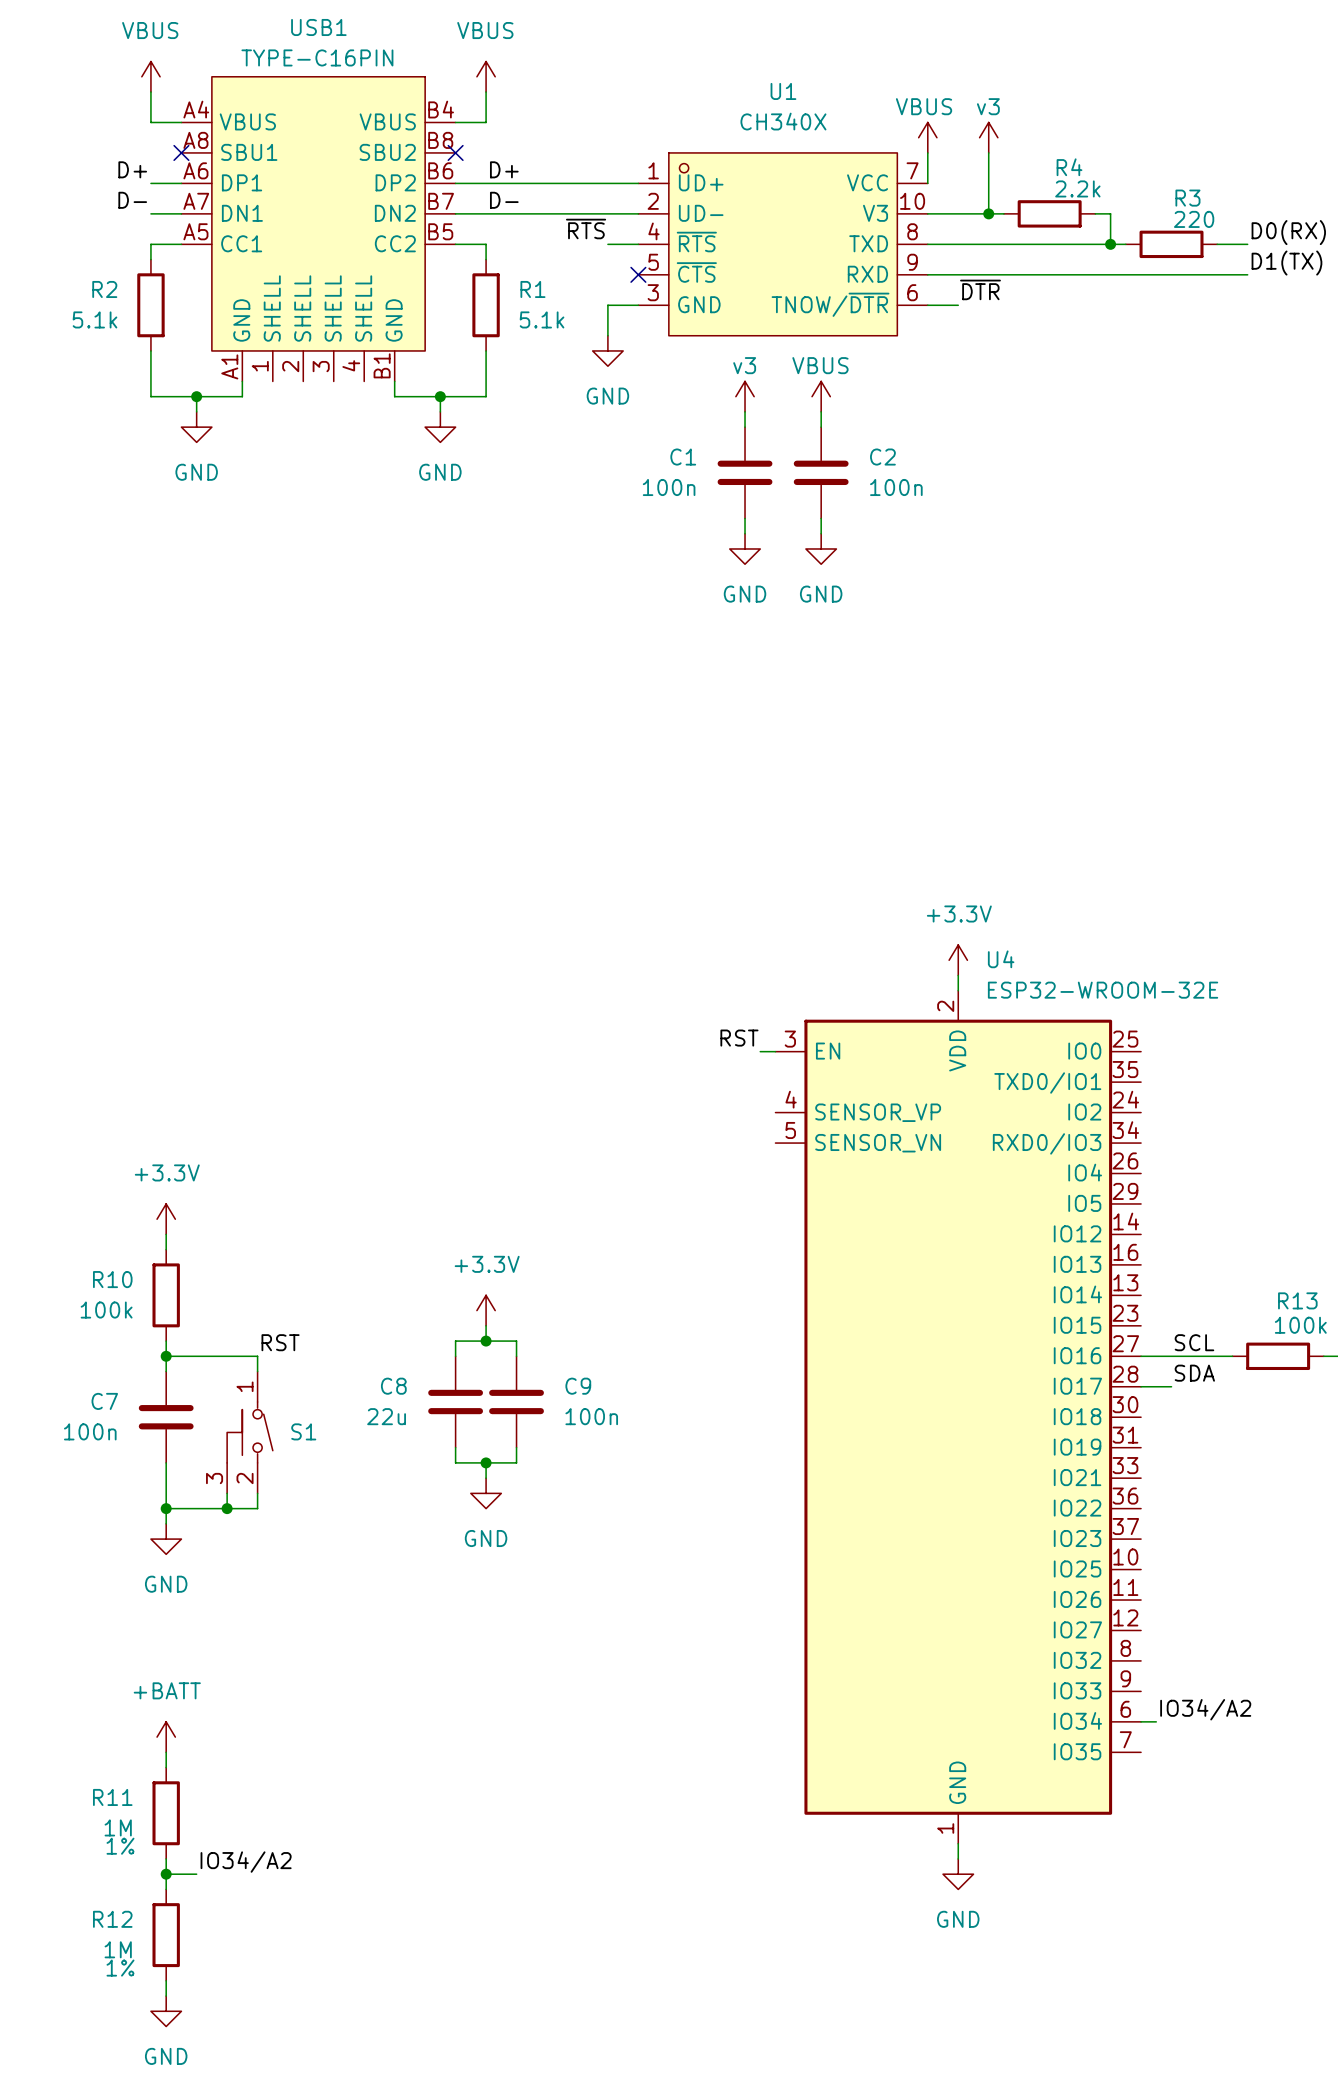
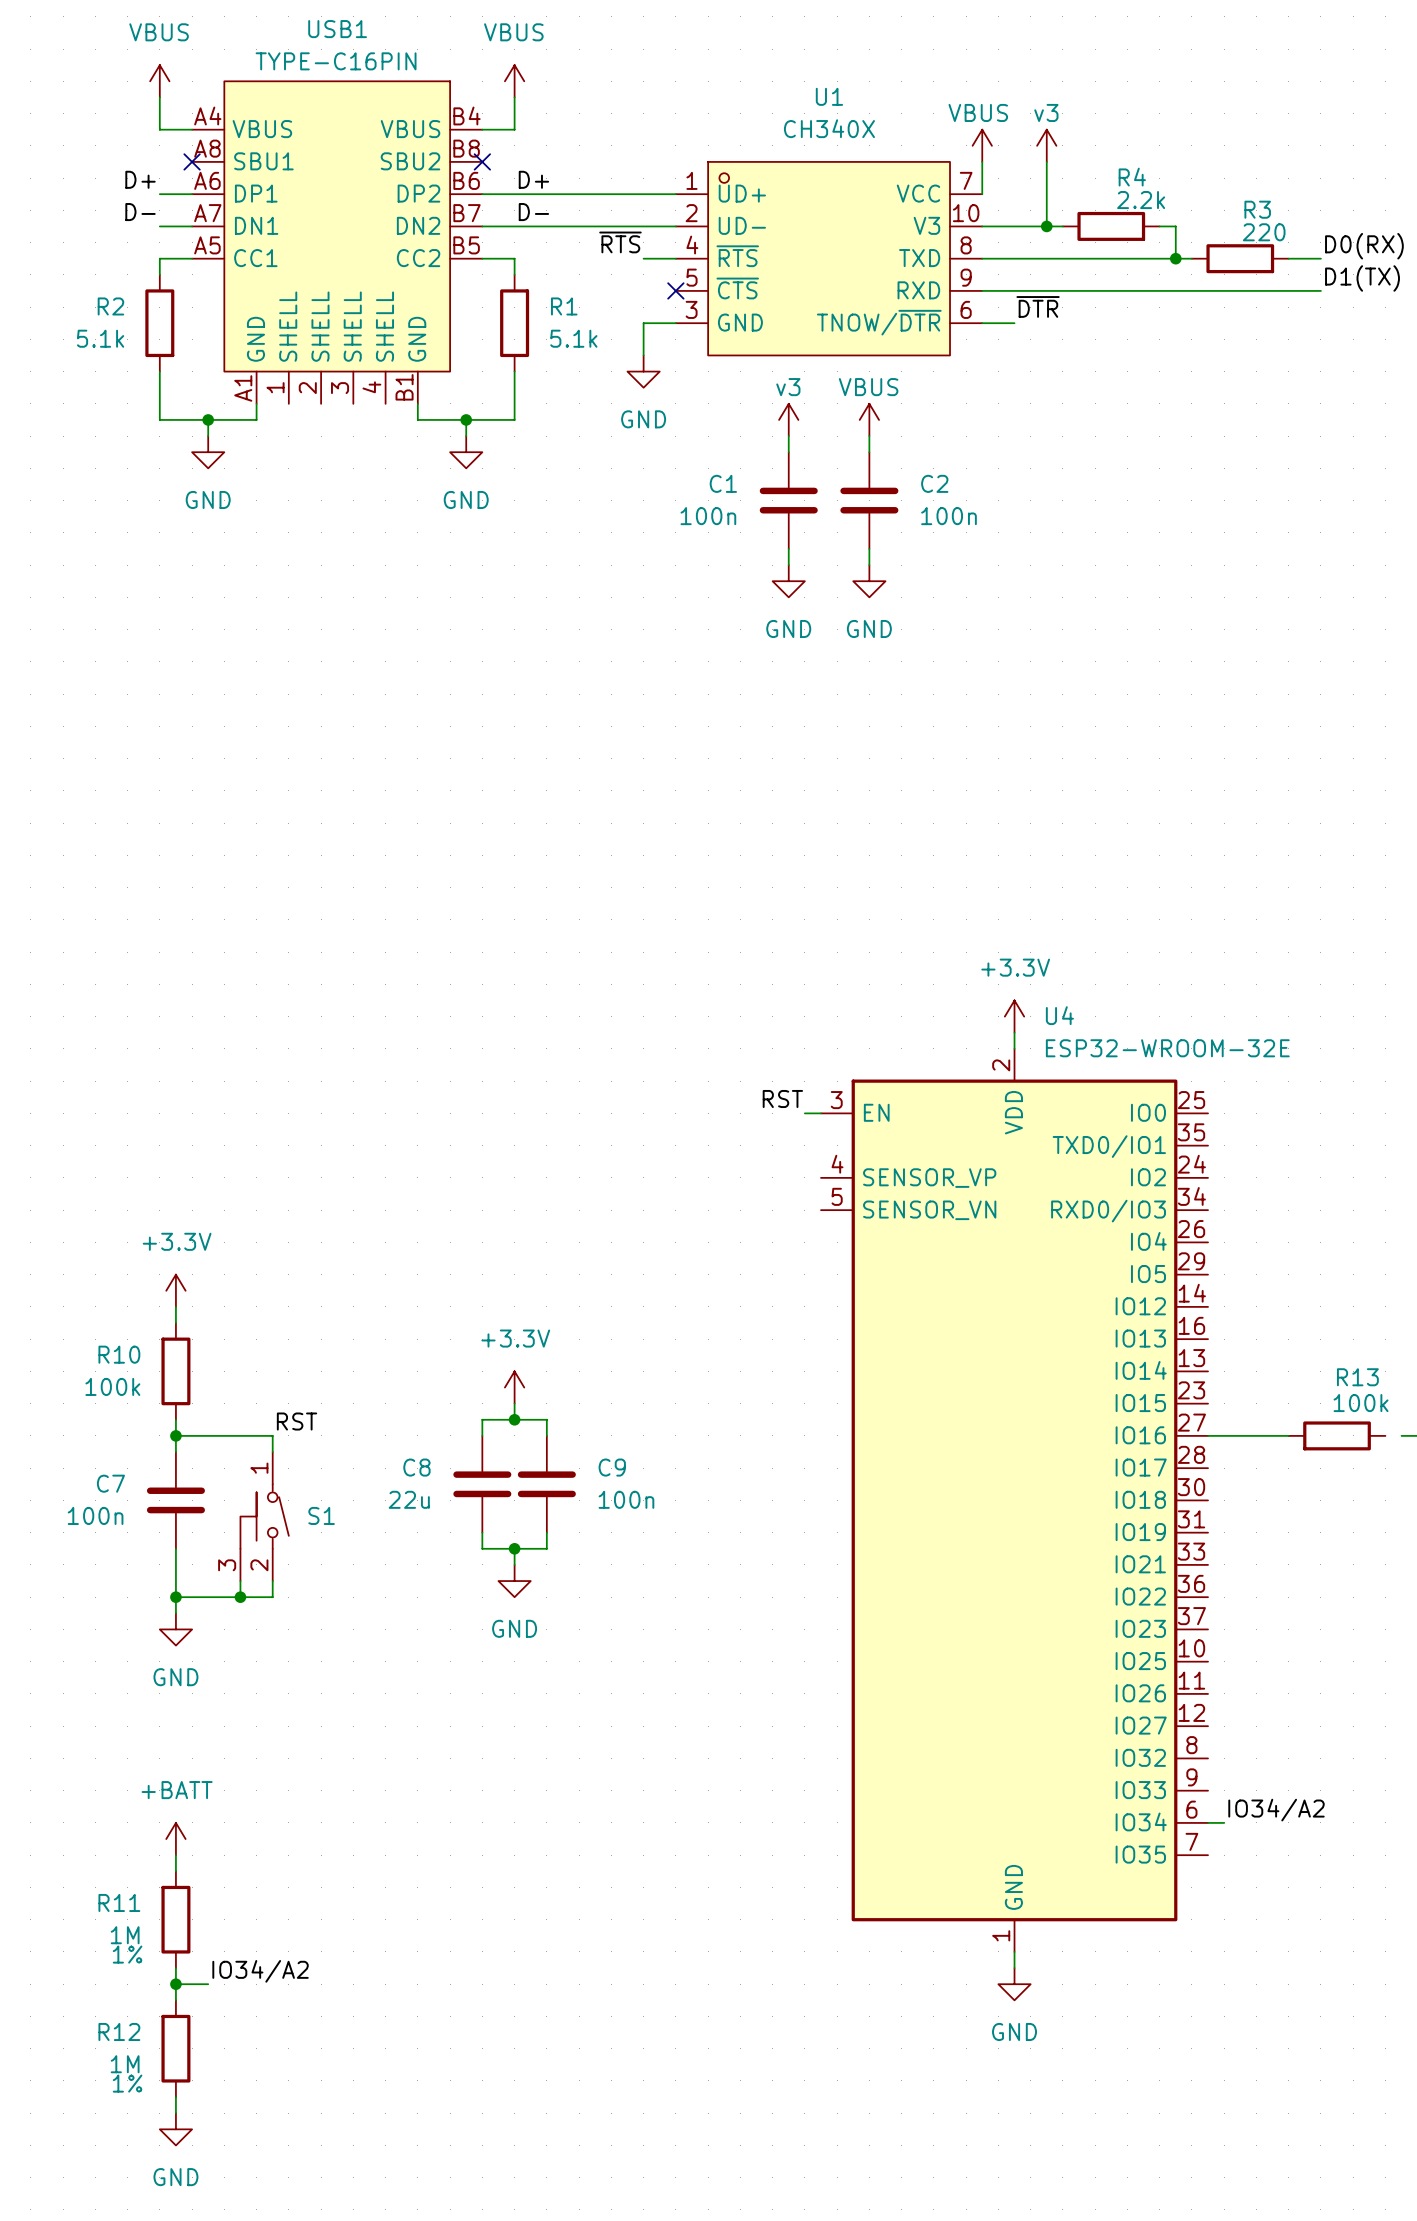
label: SCL (1194, 1342) -> none
R13 position: (1278, 1356) -> (1337, 1435)
label: SDA (1194, 1373) -> none
wire: (1141, 1386) (1171, 1386) -> none

